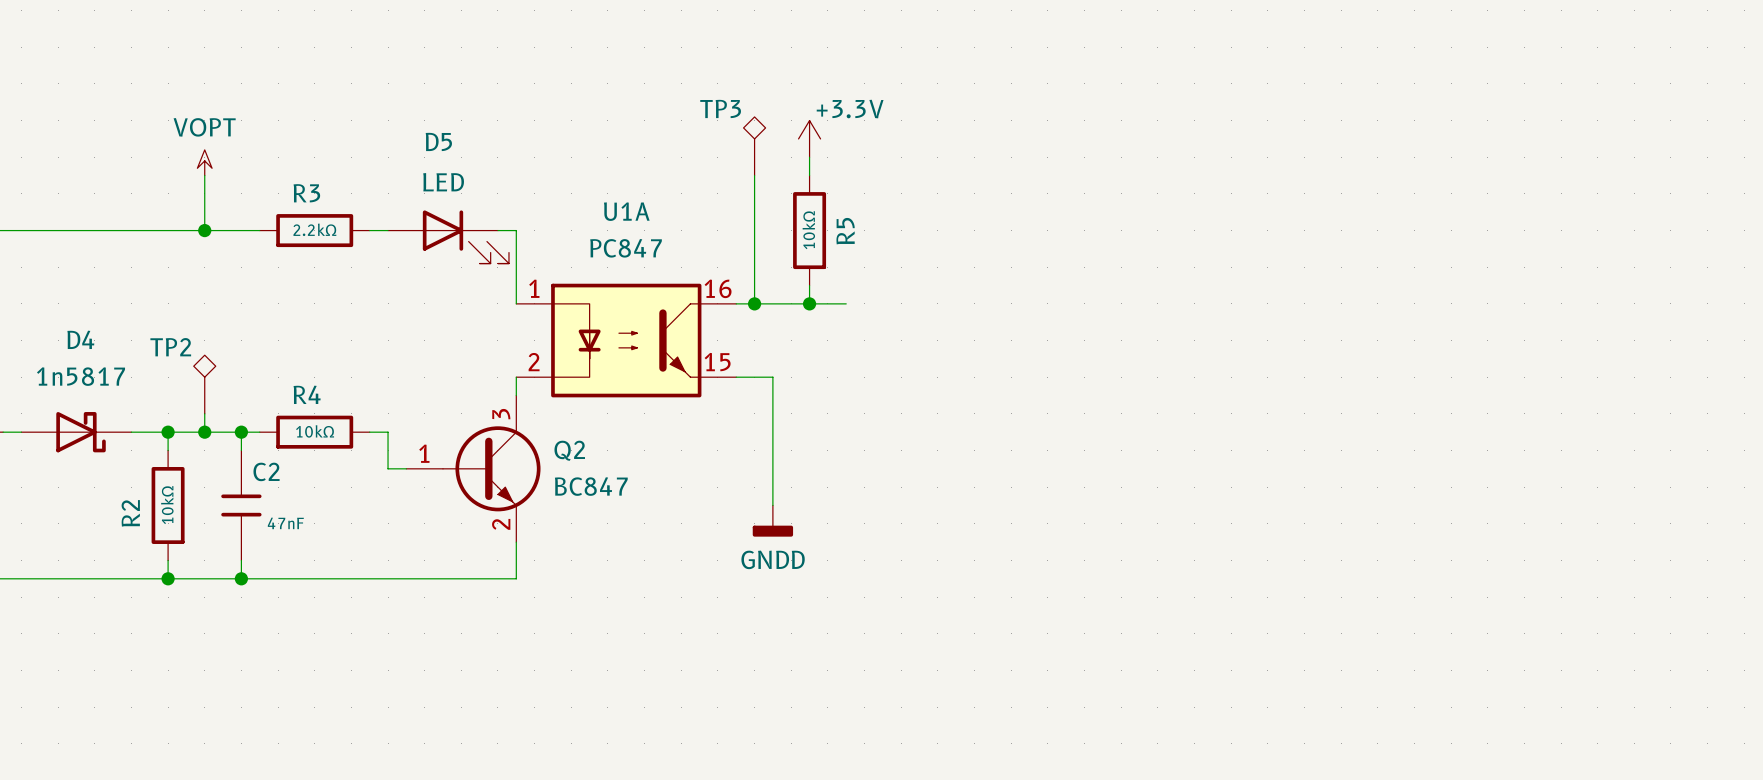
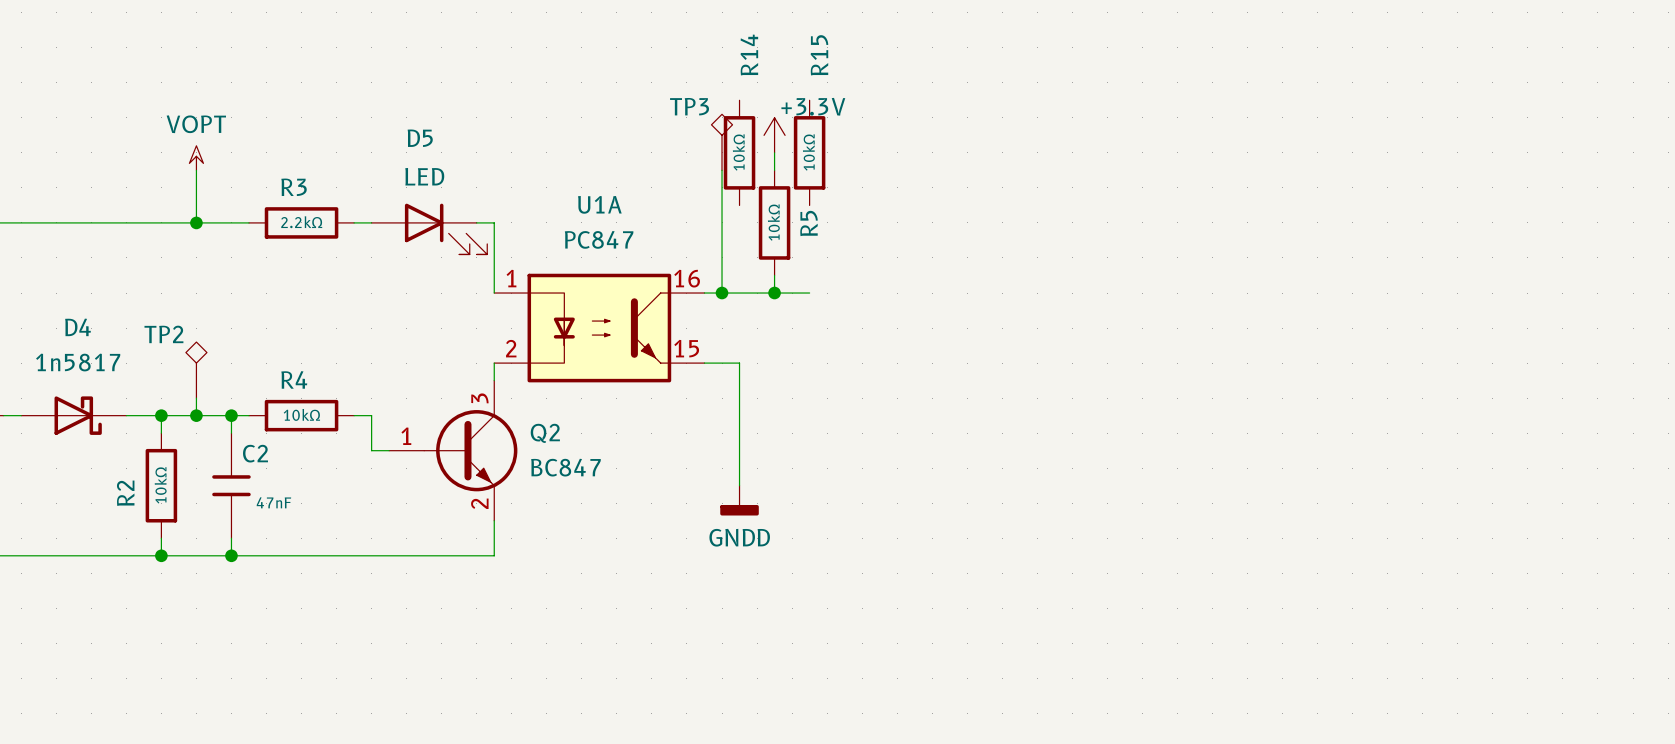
R14: none -> 10kΩ (739, 152)
R15: none -> 10kΩ (809, 152)

